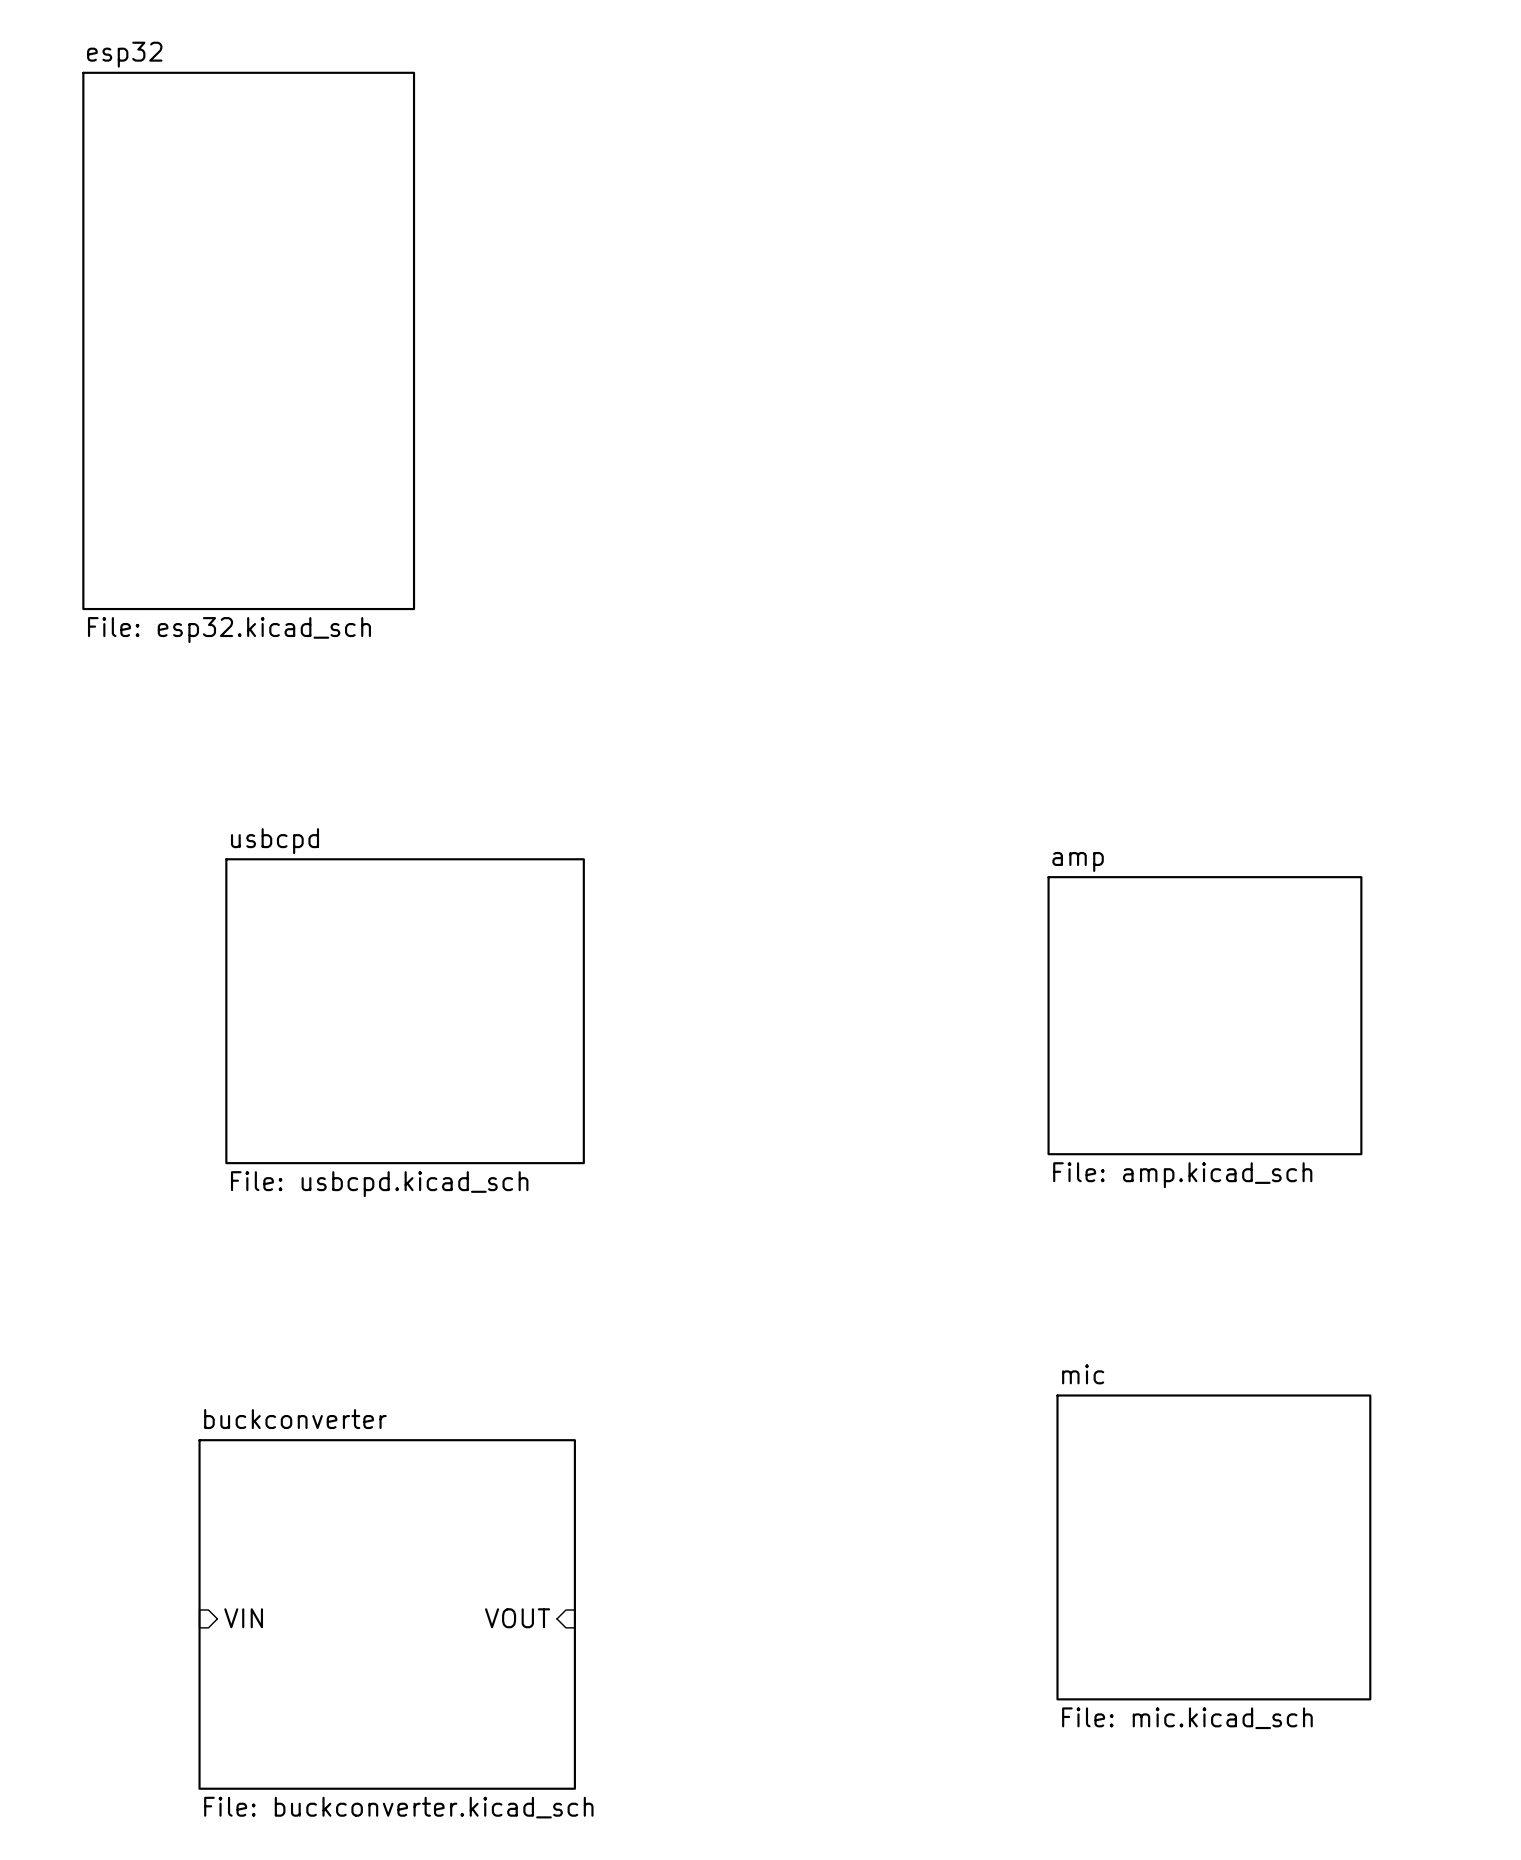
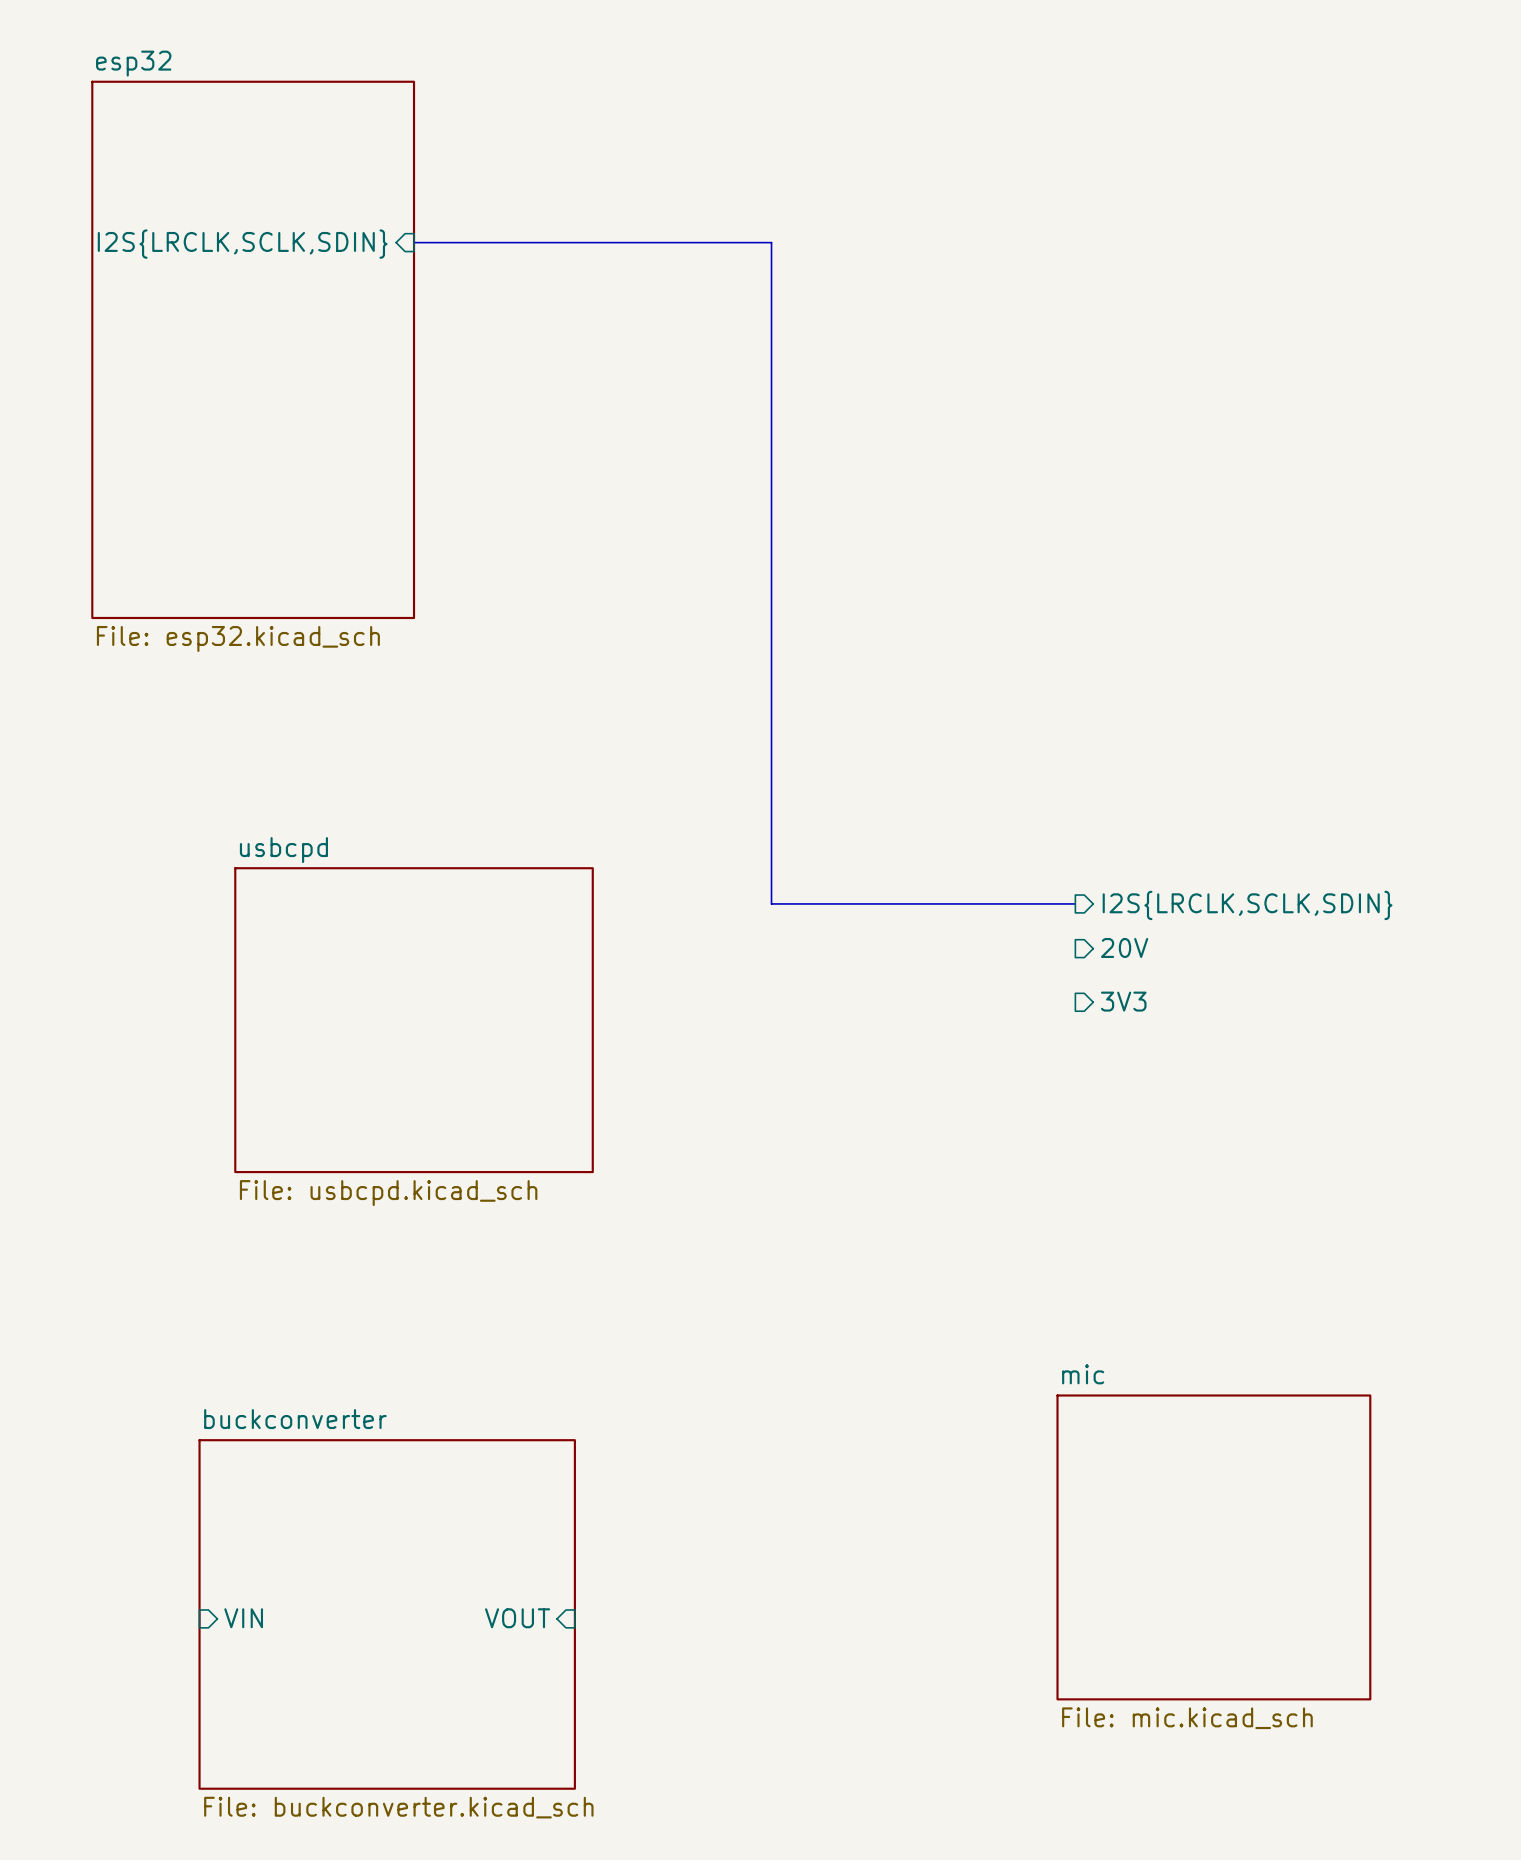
sheet esp32 name position: esp32 (124, 54) -> esp32 (133, 63)
sheet esp32 shape: [82, 71, 416, 611] -> [91, 80, 416, 620]
bus: none -> (414, 242) (771, 242) (771, 903) (1075, 903)
sheet pin: none -> I2S{LRCLK,SCLK,SDIN} (242, 244)
sheet esp32 value position: File: esp32.kicad_sch (229, 630) -> File: esp32.kicad_sch (238, 638)
sheet pin: none -> I2S{LRCLK,SCLK,SDIN} (1247, 905)
sheet pin: none -> 20V (1124, 947)
sheet pin: none -> 3V3 (1123, 1001)
sheet usbcpd position: (405, 1011) -> (414, 1020)
sheet amp: File: amp.kicad_sch (1204, 1015) -> none

